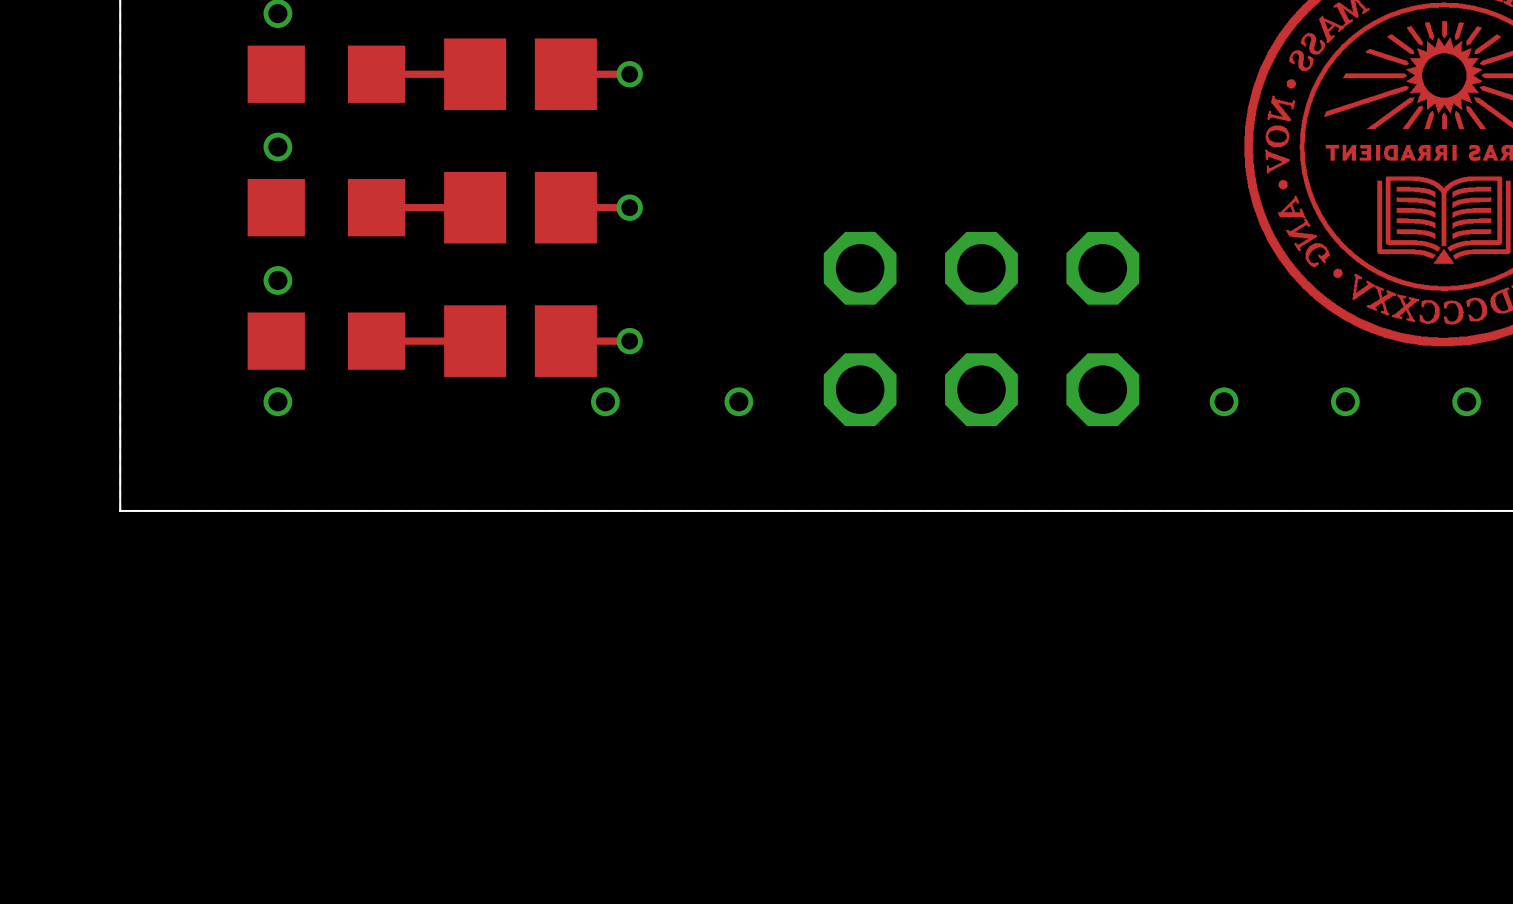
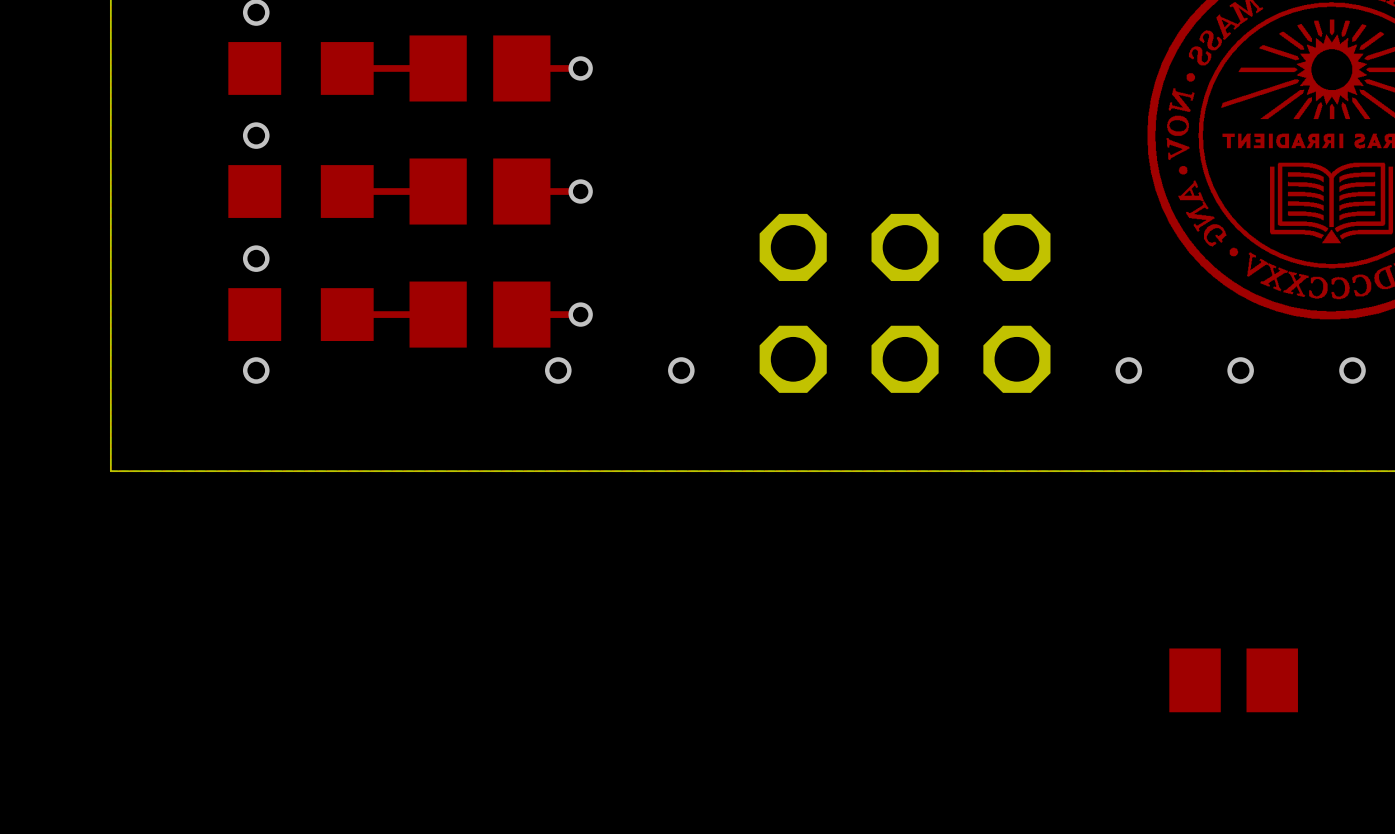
part: none -> (1233, 680)

